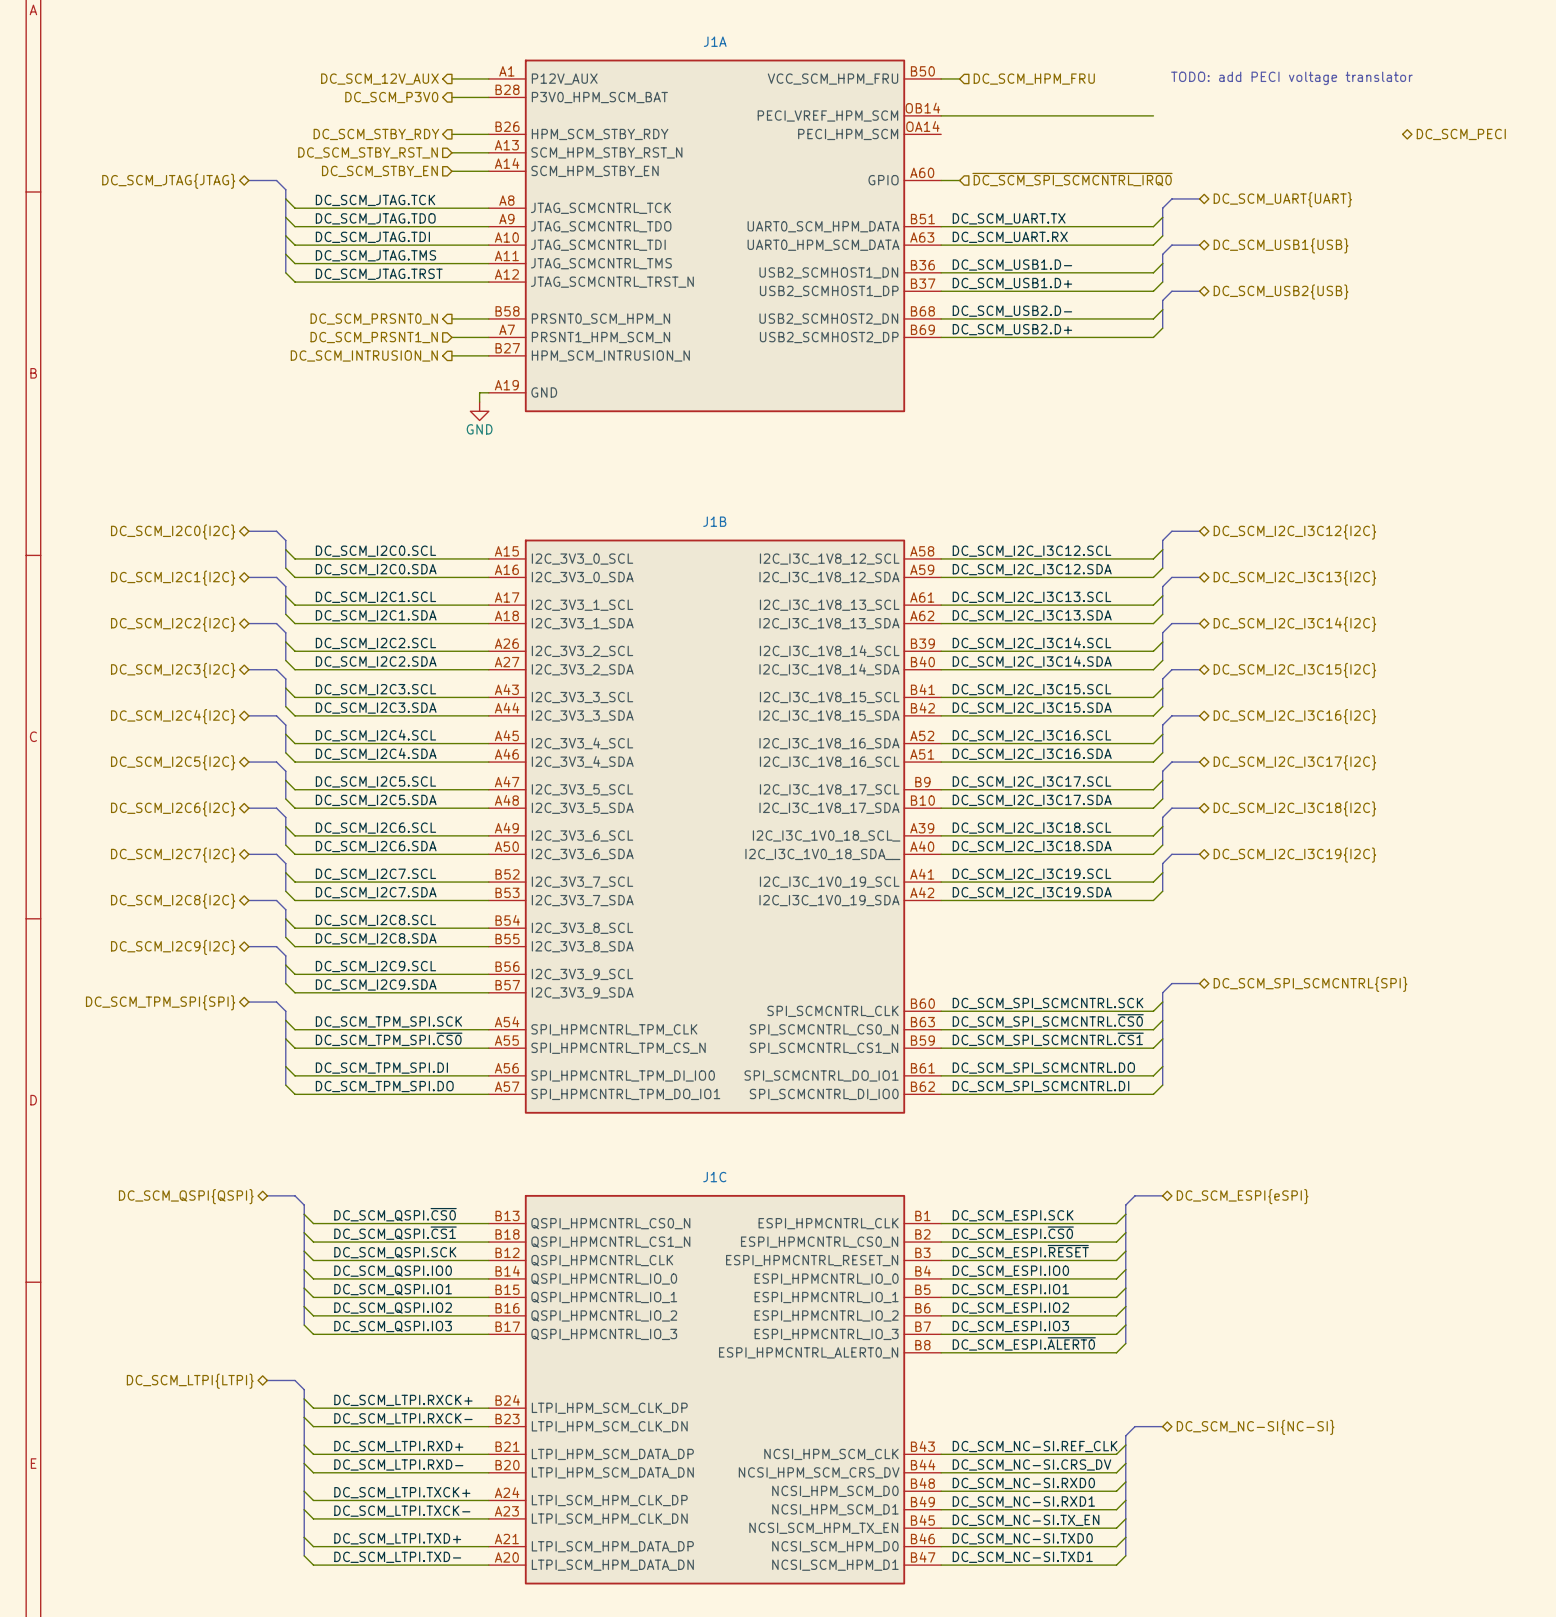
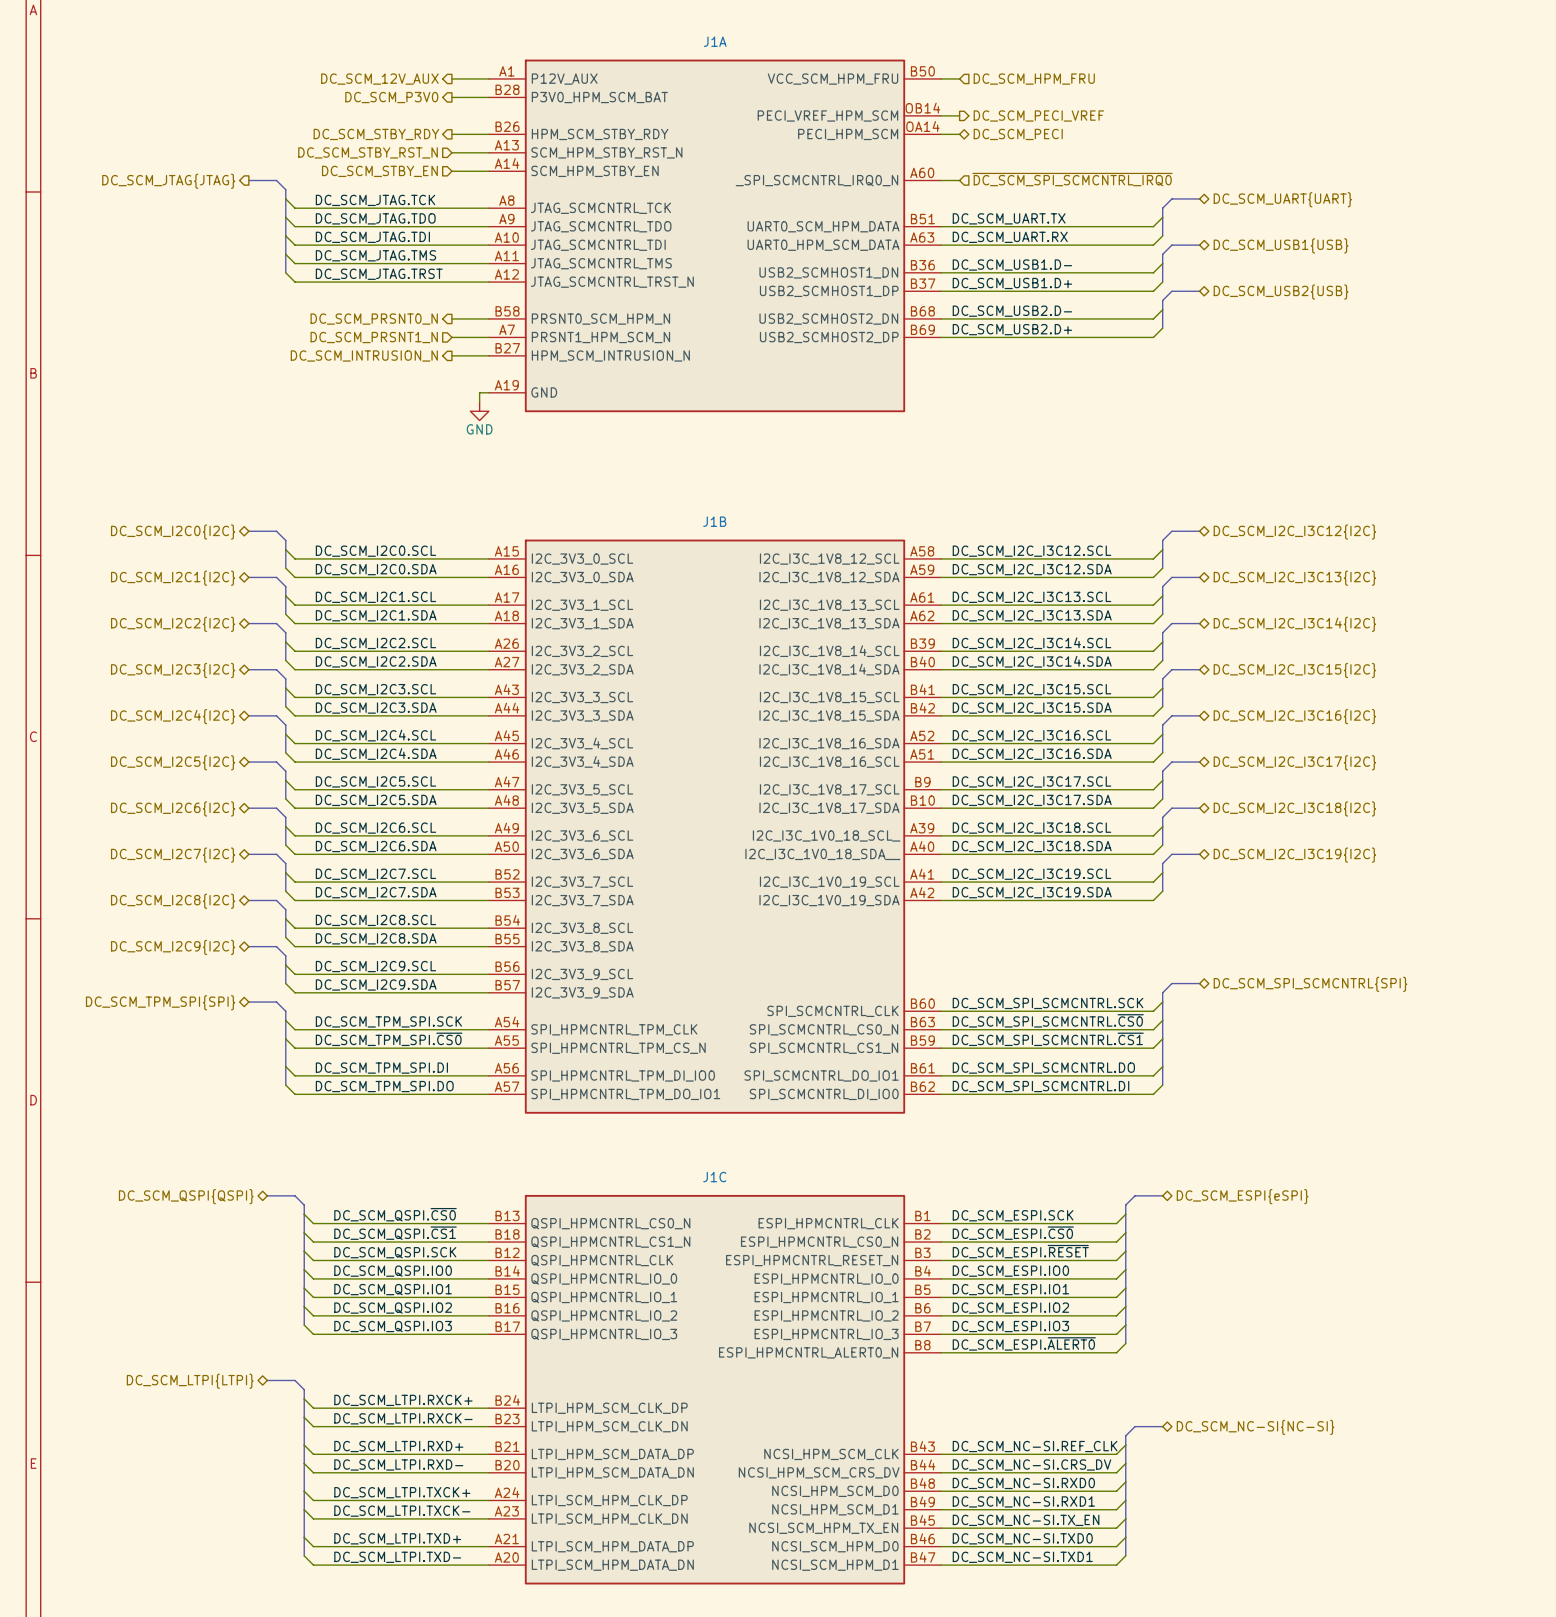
text: TODO: add PECI voltage translator (1291, 78) -> none
wire: (959, 115) (1153, 115) -> none
hierarchical label: none -> DC_SCM_PECI_VREF (1038, 115)
wire: none -> (941, 134) (959, 134)
hierarchical label: none -> DC_SCM_PECI (1018, 134)
hierarchical label: DC_SCM_PECI (1461, 134) -> none
J1A pin name: GPIO (883, 180) -> _SPI_SCMCNTRL_IRQ0_N (816, 180)
hierarchical label shape: bidirectional (168, 181) -> output (168, 181)

